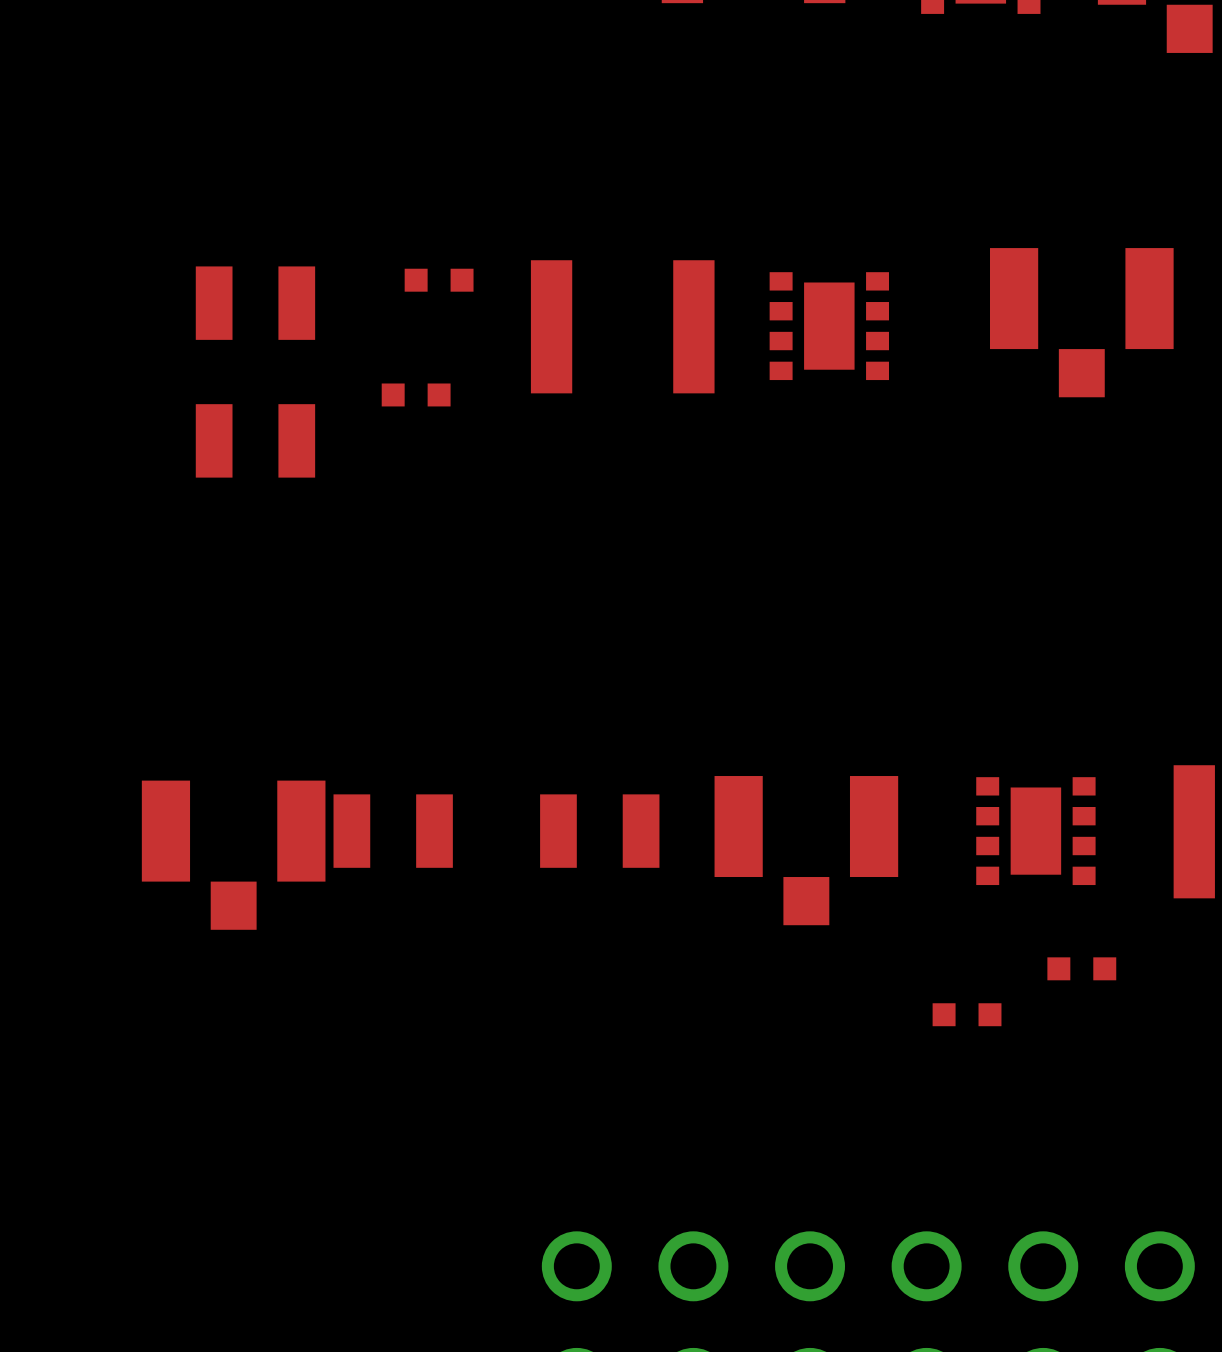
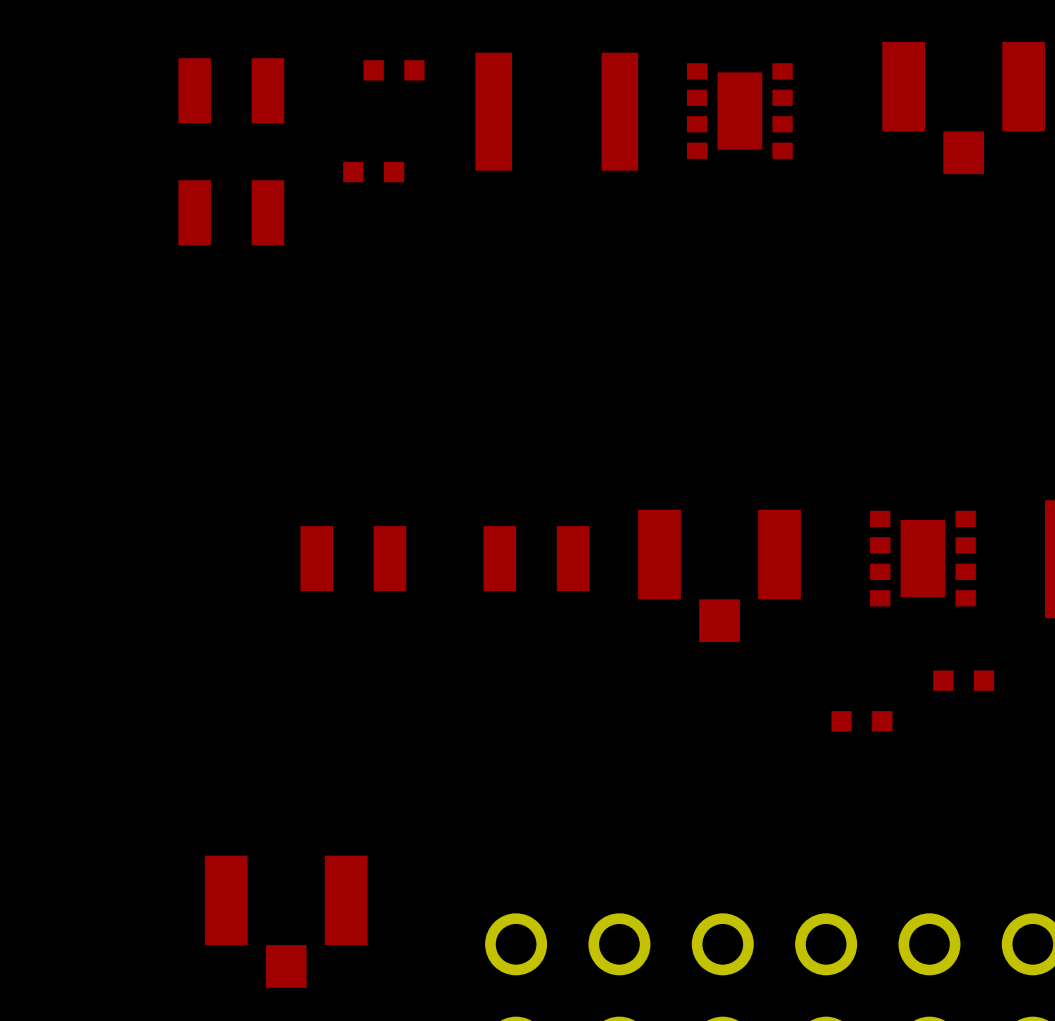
part position: (233, 855) -> (286, 921)

